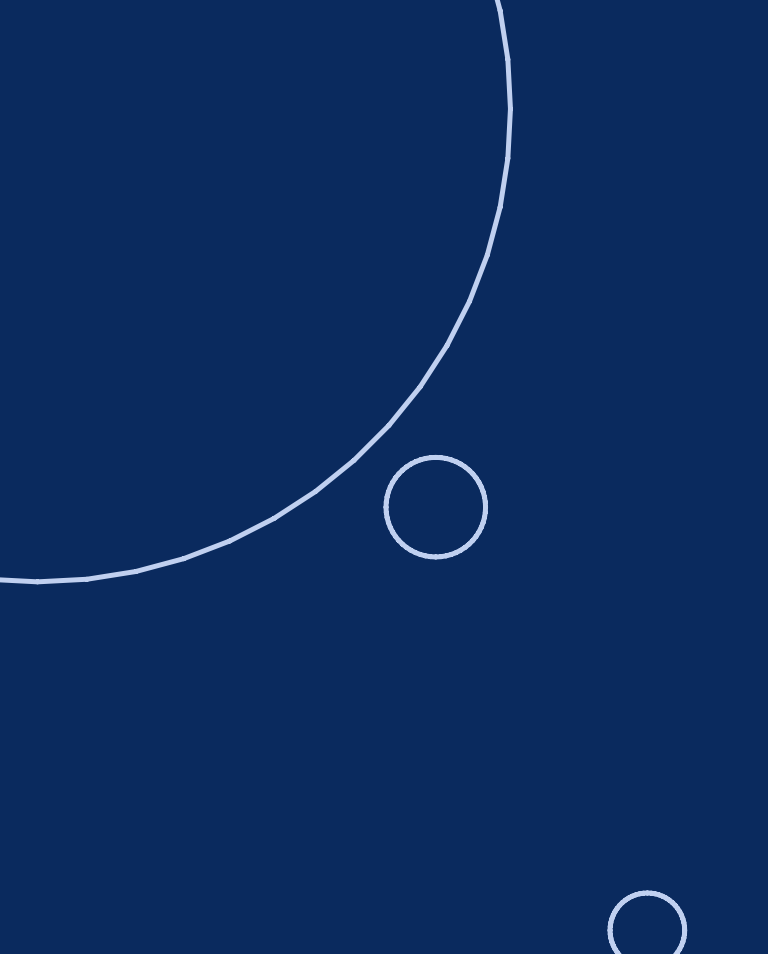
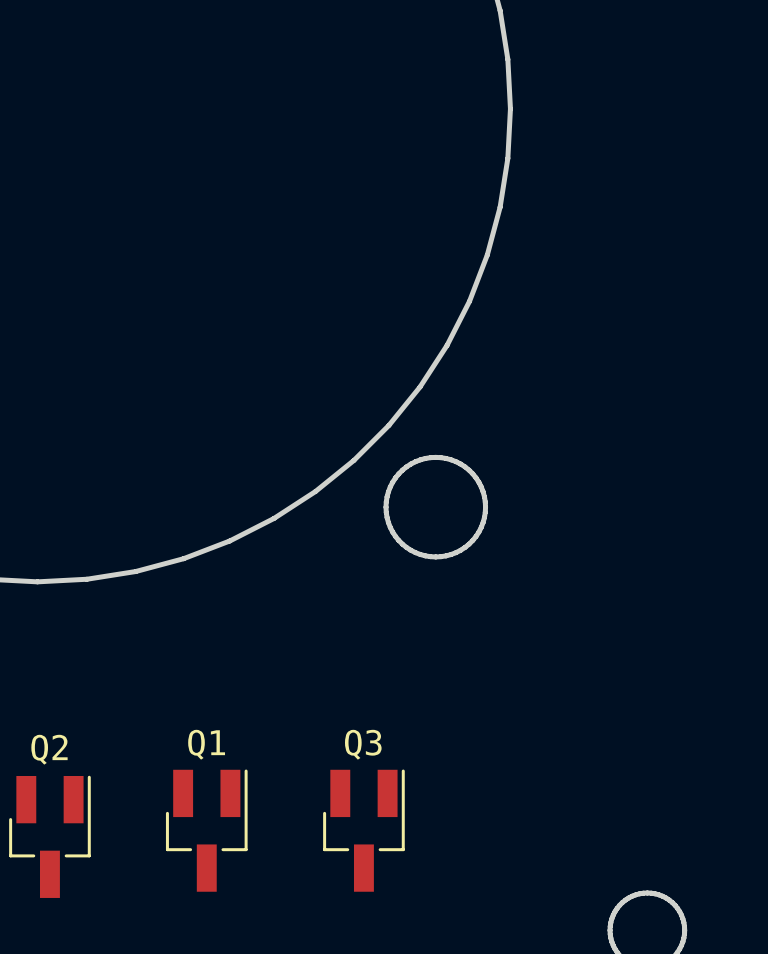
Q1: none -> (206, 830)
Q3: none -> (363, 830)
Q2: none -> (49, 836)

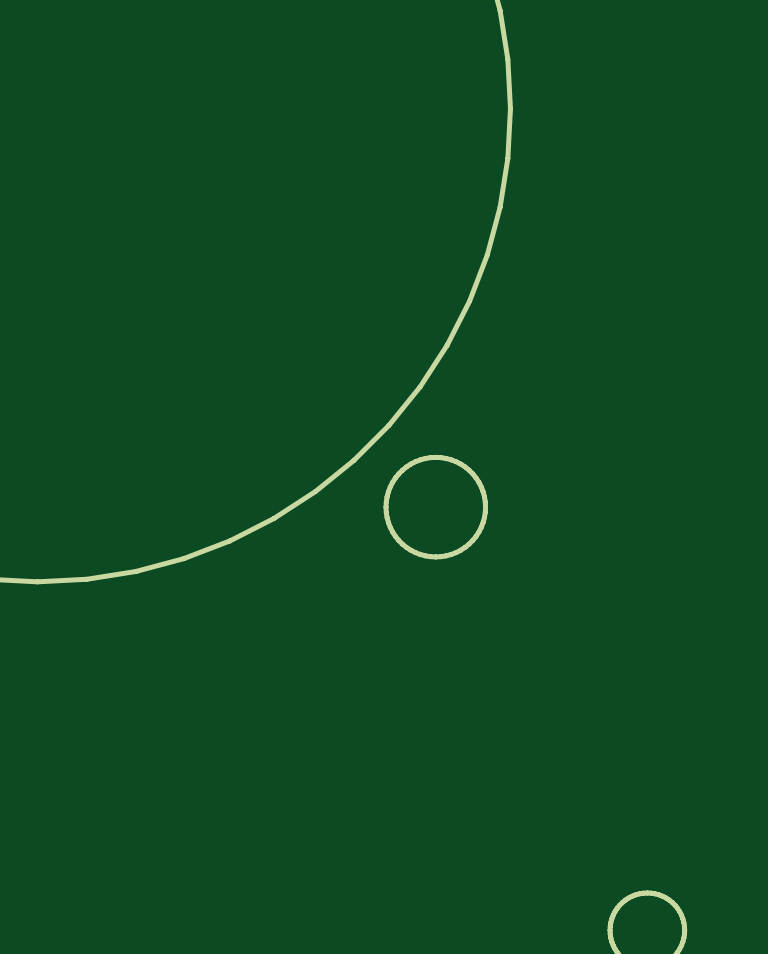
Q1: (206, 830) -> none
Q3: (363, 830) -> none
Q2: (49, 836) -> none

